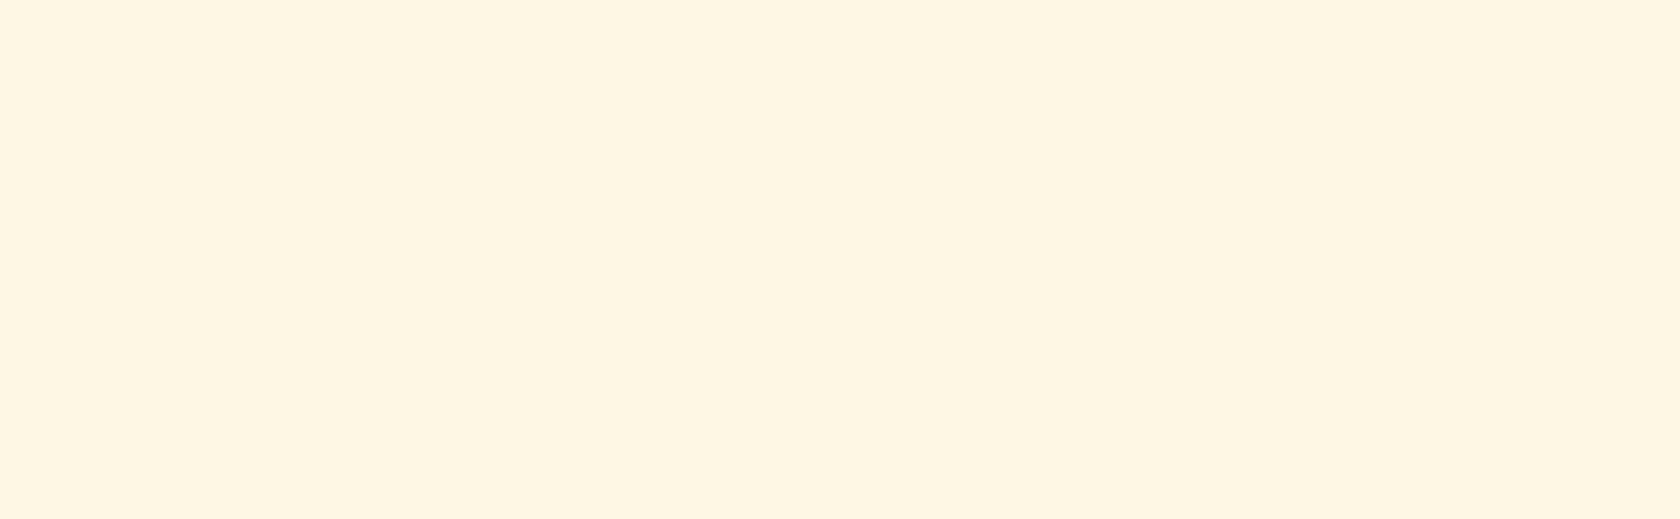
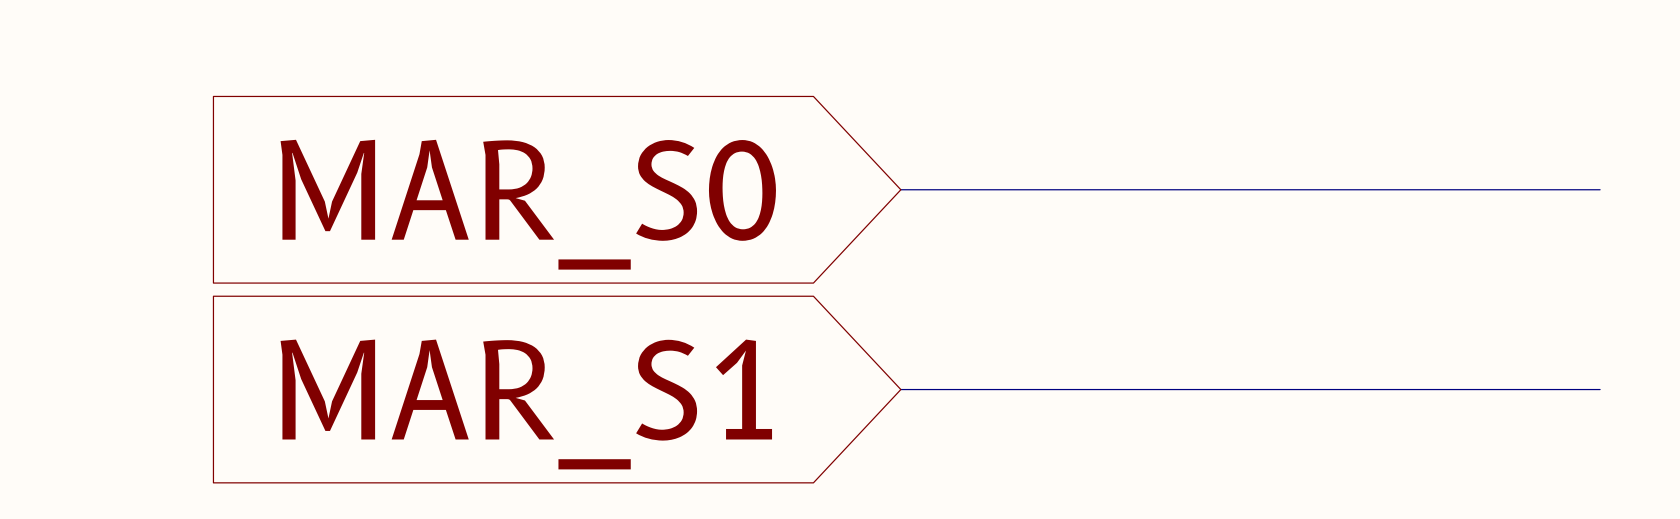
wire: none -> (900, 189) (1600, 189)
global label: none -> MAR_S0 (528, 204)
wire: none -> (900, 389) (1600, 389)
global label: none -> MAR_S1 (526, 404)

